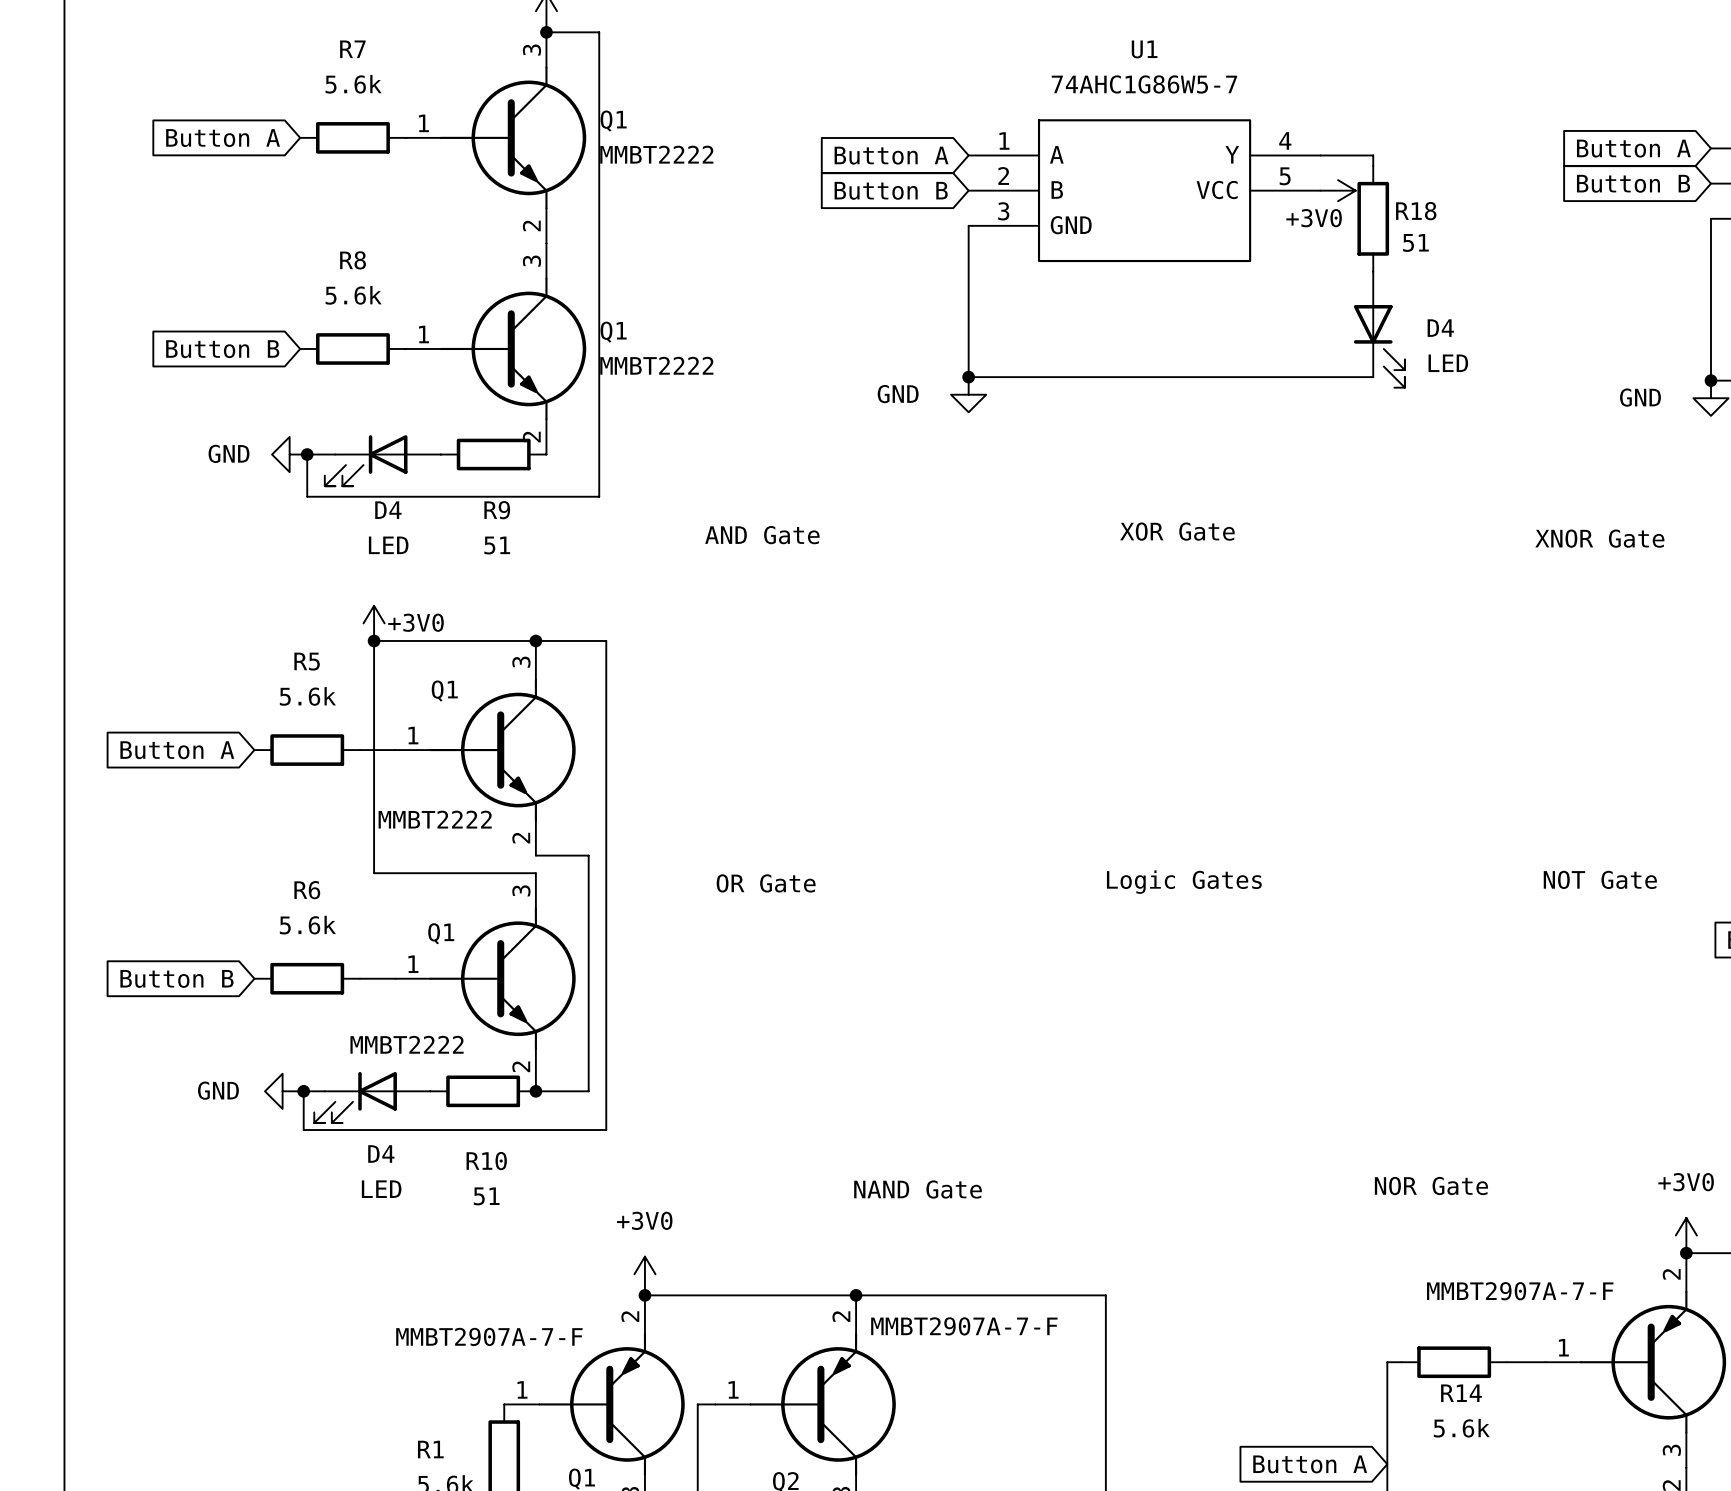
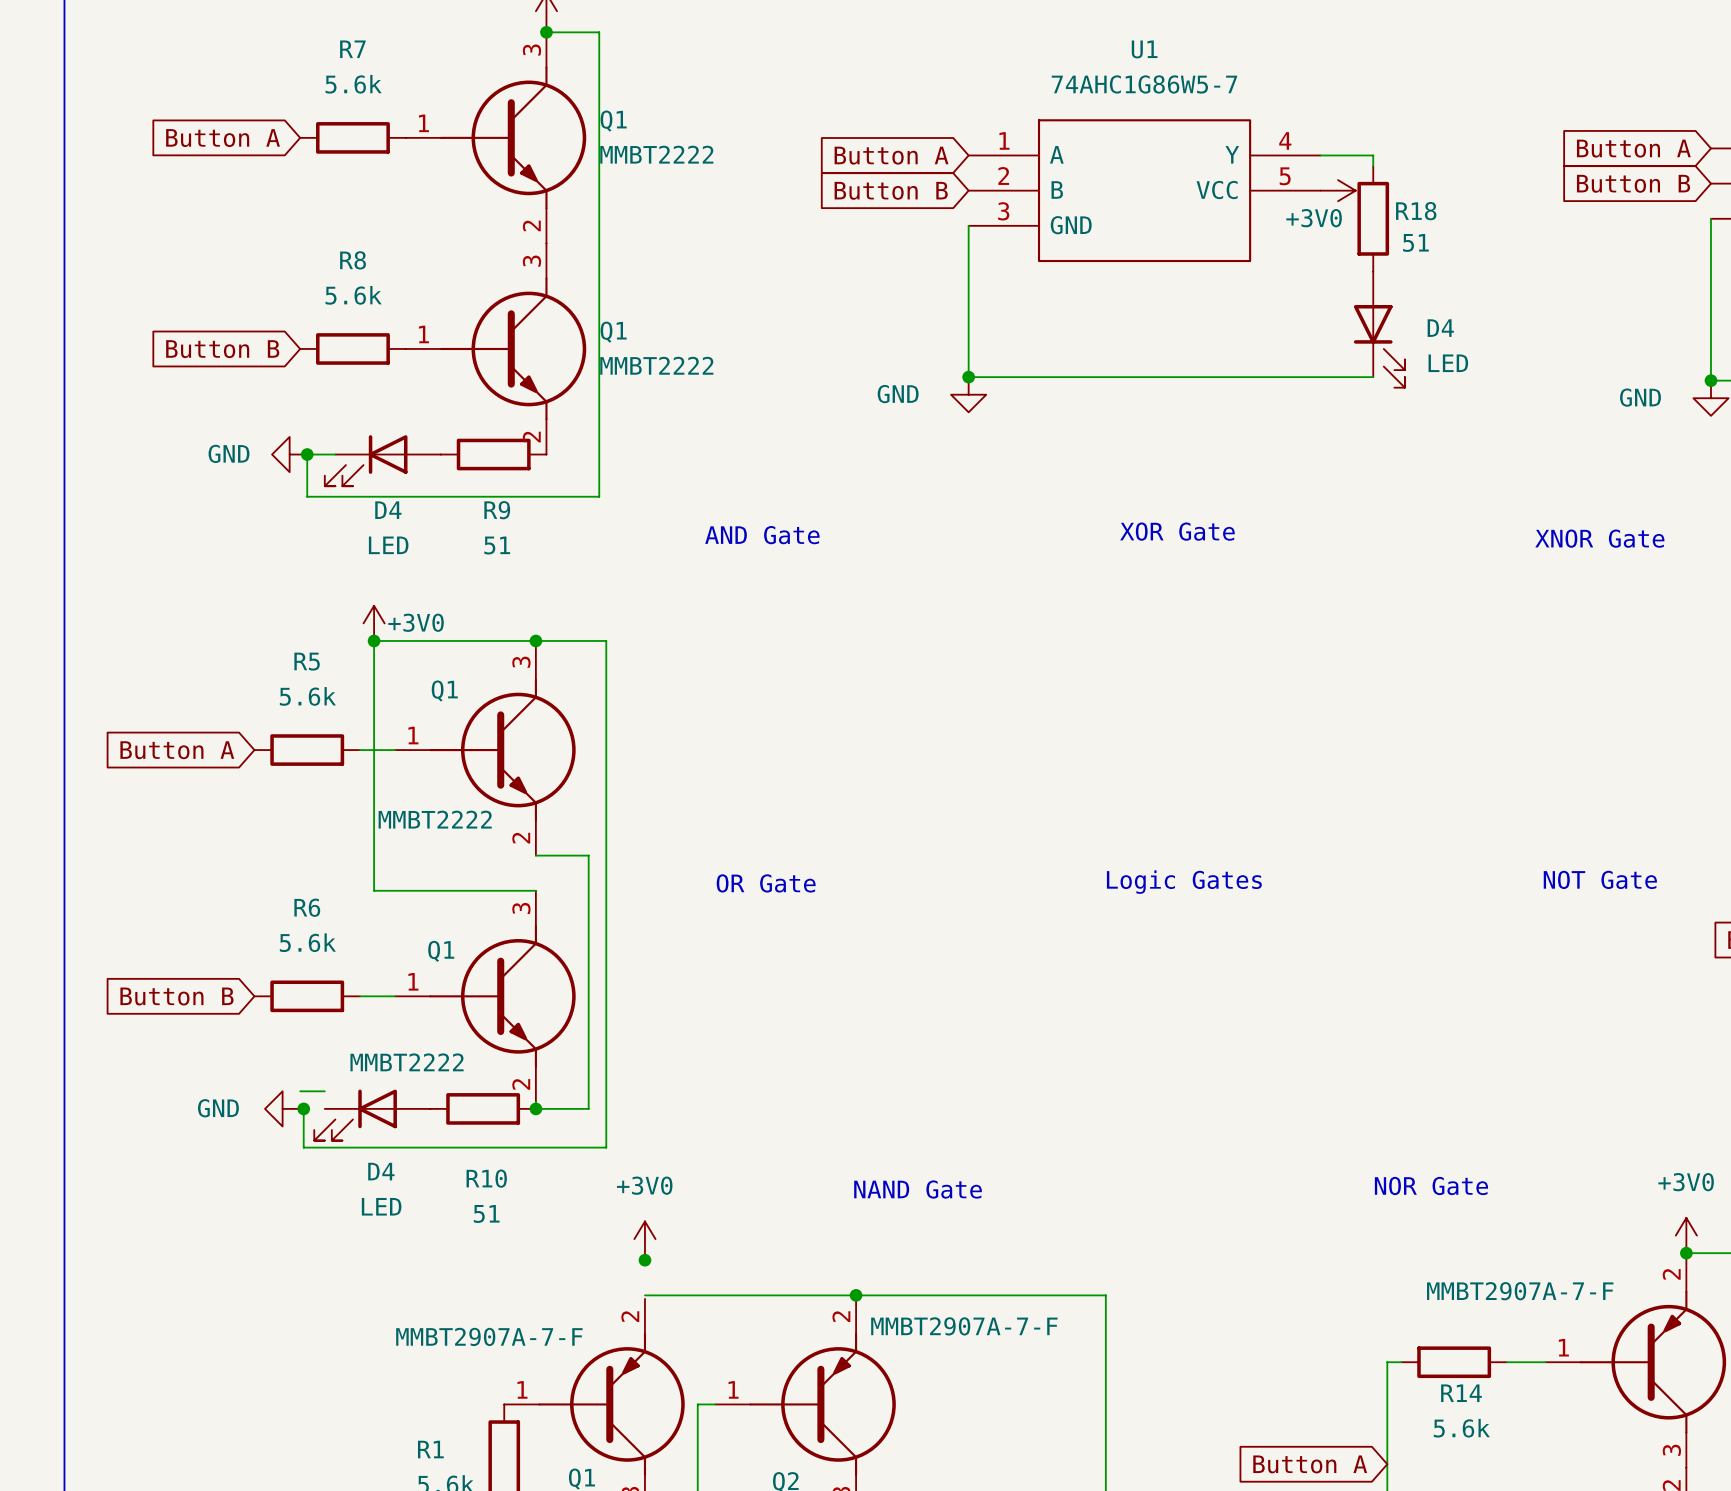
wire: (374, 873) (535, 873) -> (374, 873) (374, 890) (535, 890)
global label position: Button B (176, 978) -> Button B (176, 996)
R6 position: (307, 978) -> (307, 996)
wire: (360, 978) (395, 978) -> (360, 996) (395, 996)
Q1 position: (485, 978) -> (485, 996)
wire: (535, 1084) (535, 1091) (588, 1091) -> (535, 1101) (535, 1108) (588, 1108) (588, 1091)
power symbol position: GND (282, 1091) -> GND (282, 1108)
wire: (303, 1091) (303, 1108) -> none
junction position: (303, 1091) -> (303, 1108)
R10 position: (483, 1091) -> (483, 1108)
junction position: (535, 1091) -> (535, 1108)
D4 position: (372, 1097) -> (372, 1115)
wire: (303, 1130) (606, 1130) -> (303, 1130) (303, 1147) (606, 1147) (606, 1130)
power symbol position: +3V0 (644, 1274) -> +3V0 (644, 1239)
junction position: (644, 1295) -> (644, 1260)

